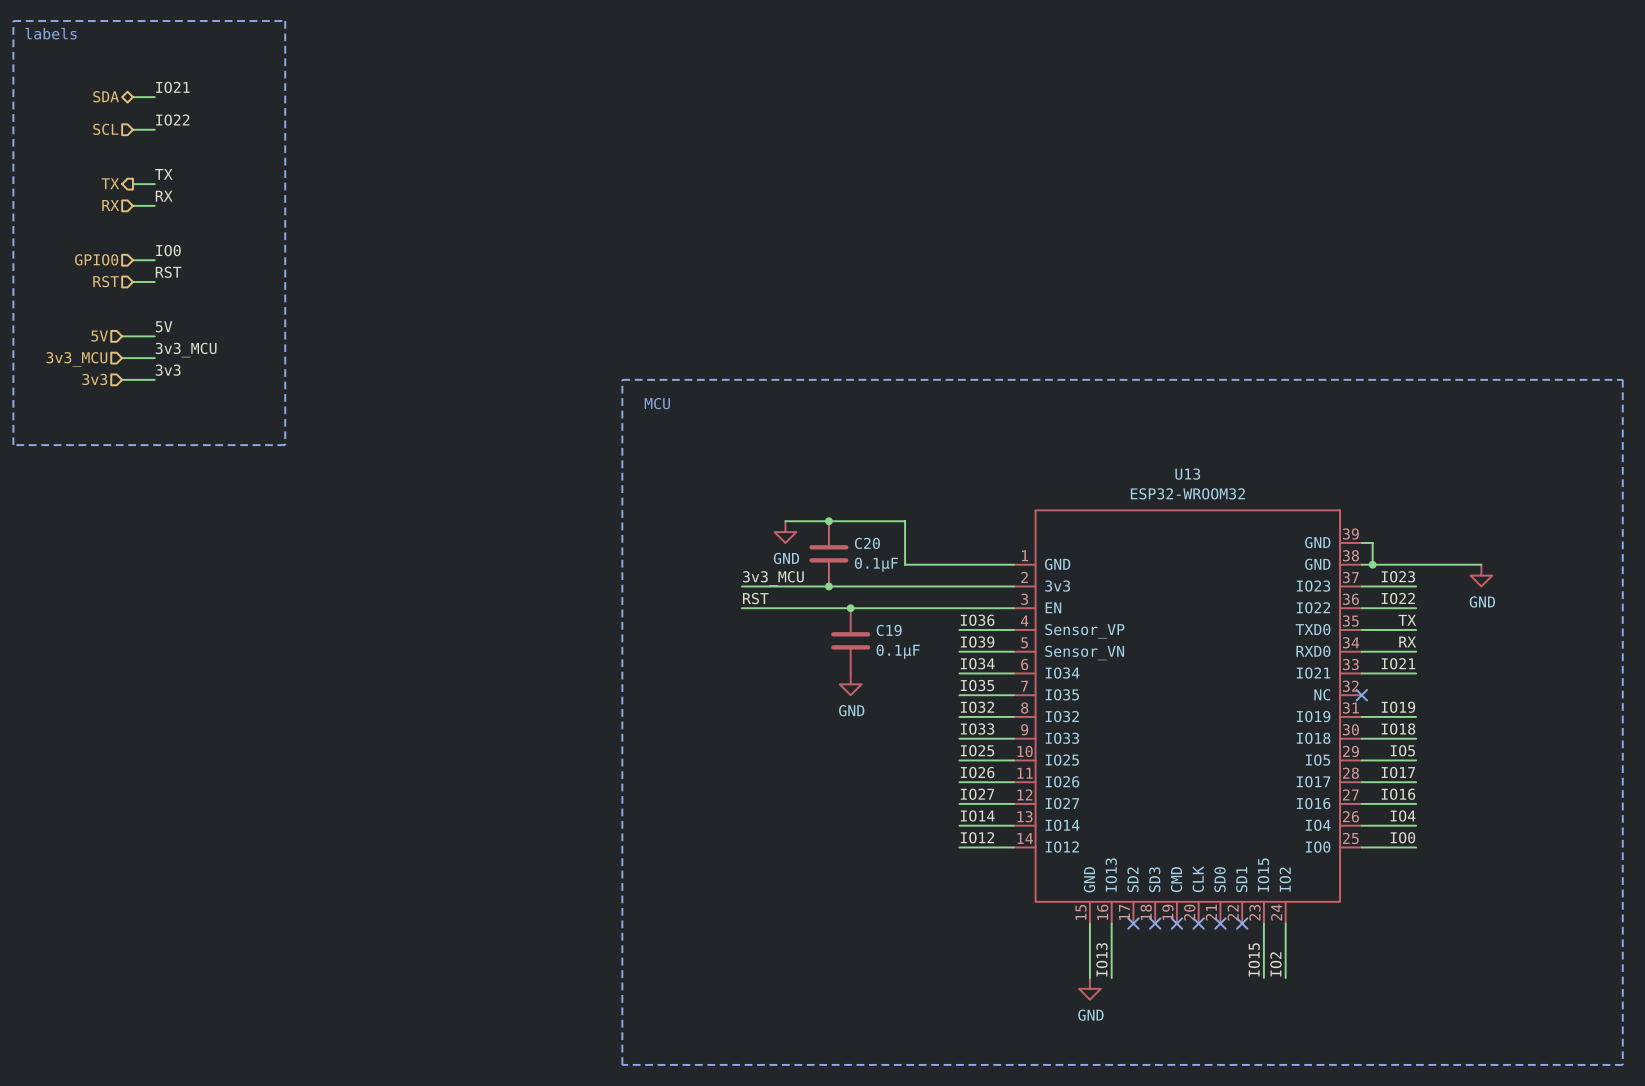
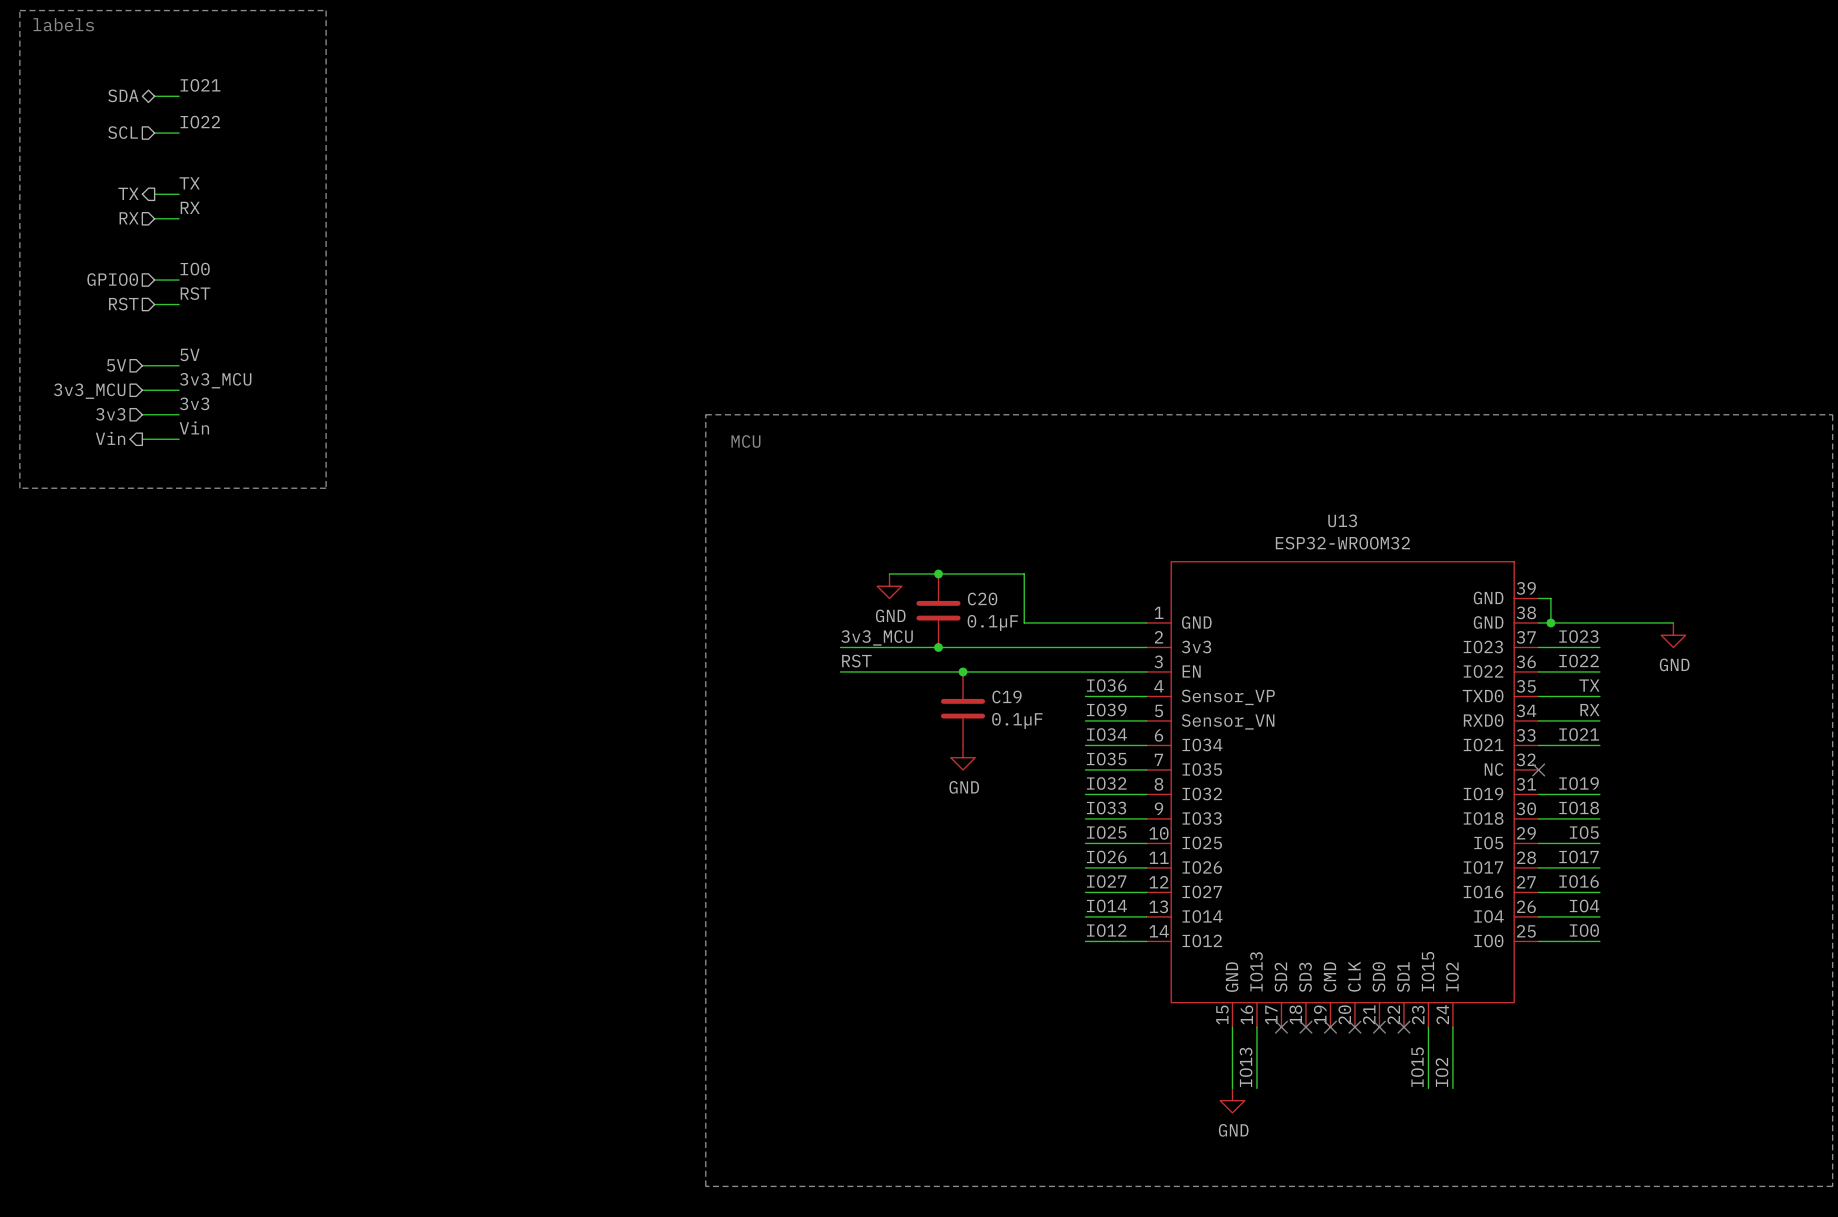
label: none -> Vin (194, 427)
hierarchical label: none -> Vin (110, 438)
wire: none -> (142, 439) (179, 439)

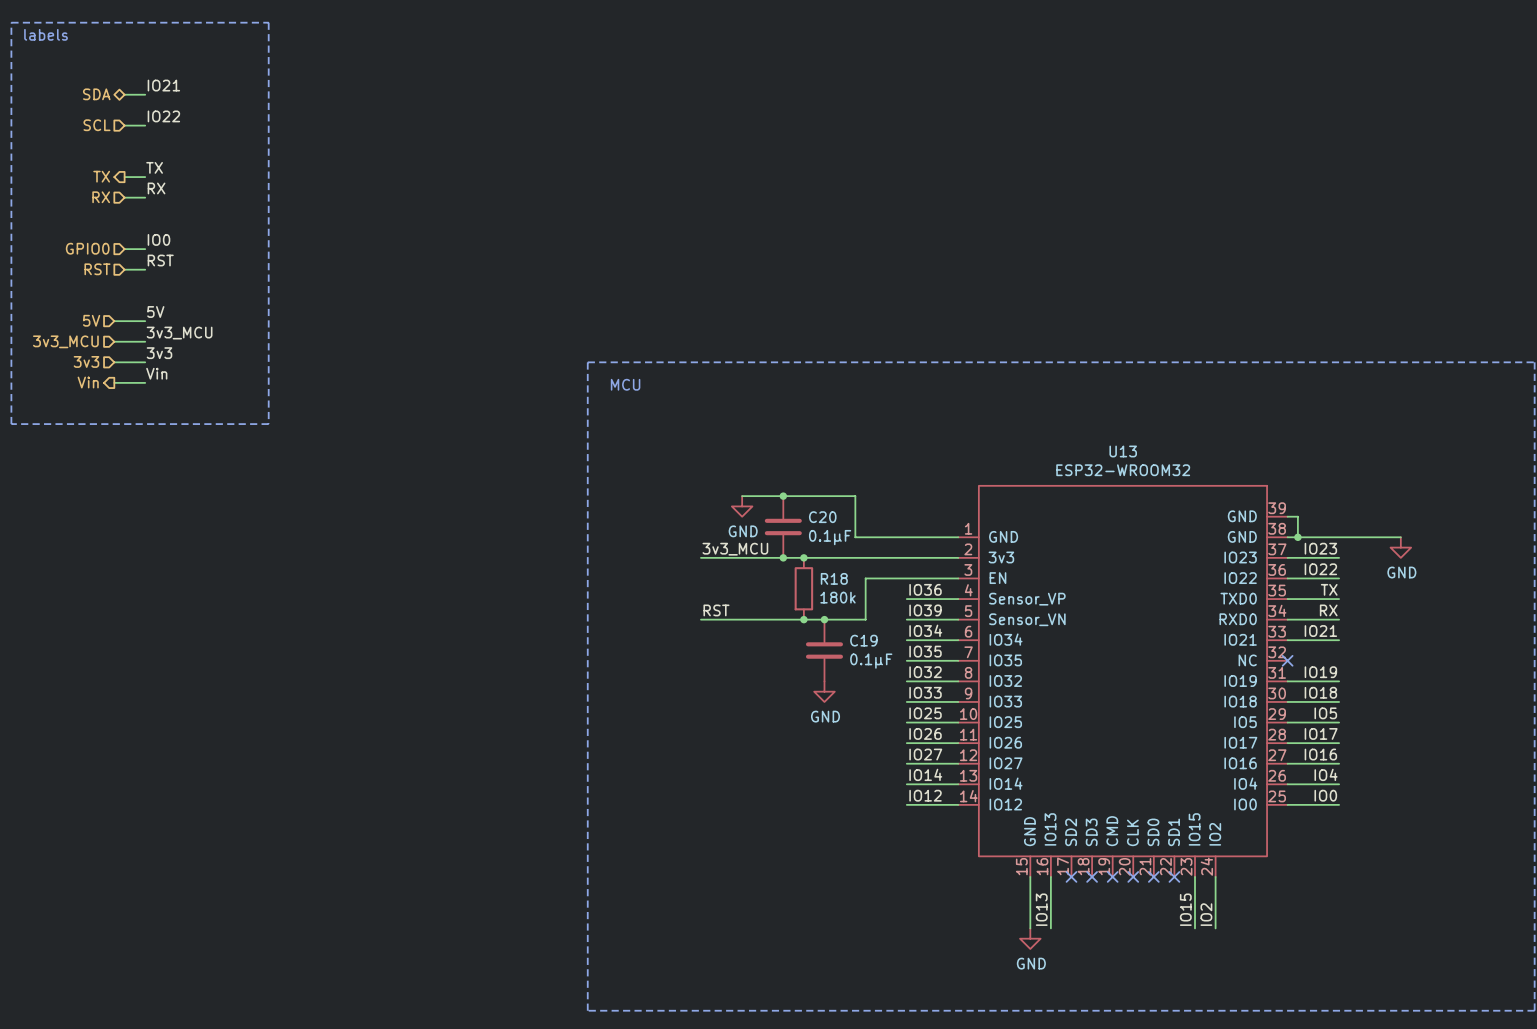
junction: none -> (803, 557)
label position: RST (856, 661) -> RST (716, 610)
wire: (840, 671) (1036, 671) -> (700, 619) (865, 619) (865, 578)
junction: (963, 671) -> none
R18: none -> 180k (803, 588)
C19 position: (963, 708) -> (824, 650)
junction: none -> (803, 619)
junction: none -> (824, 619)
power symbol position: GND (963, 757) -> GND (824, 691)

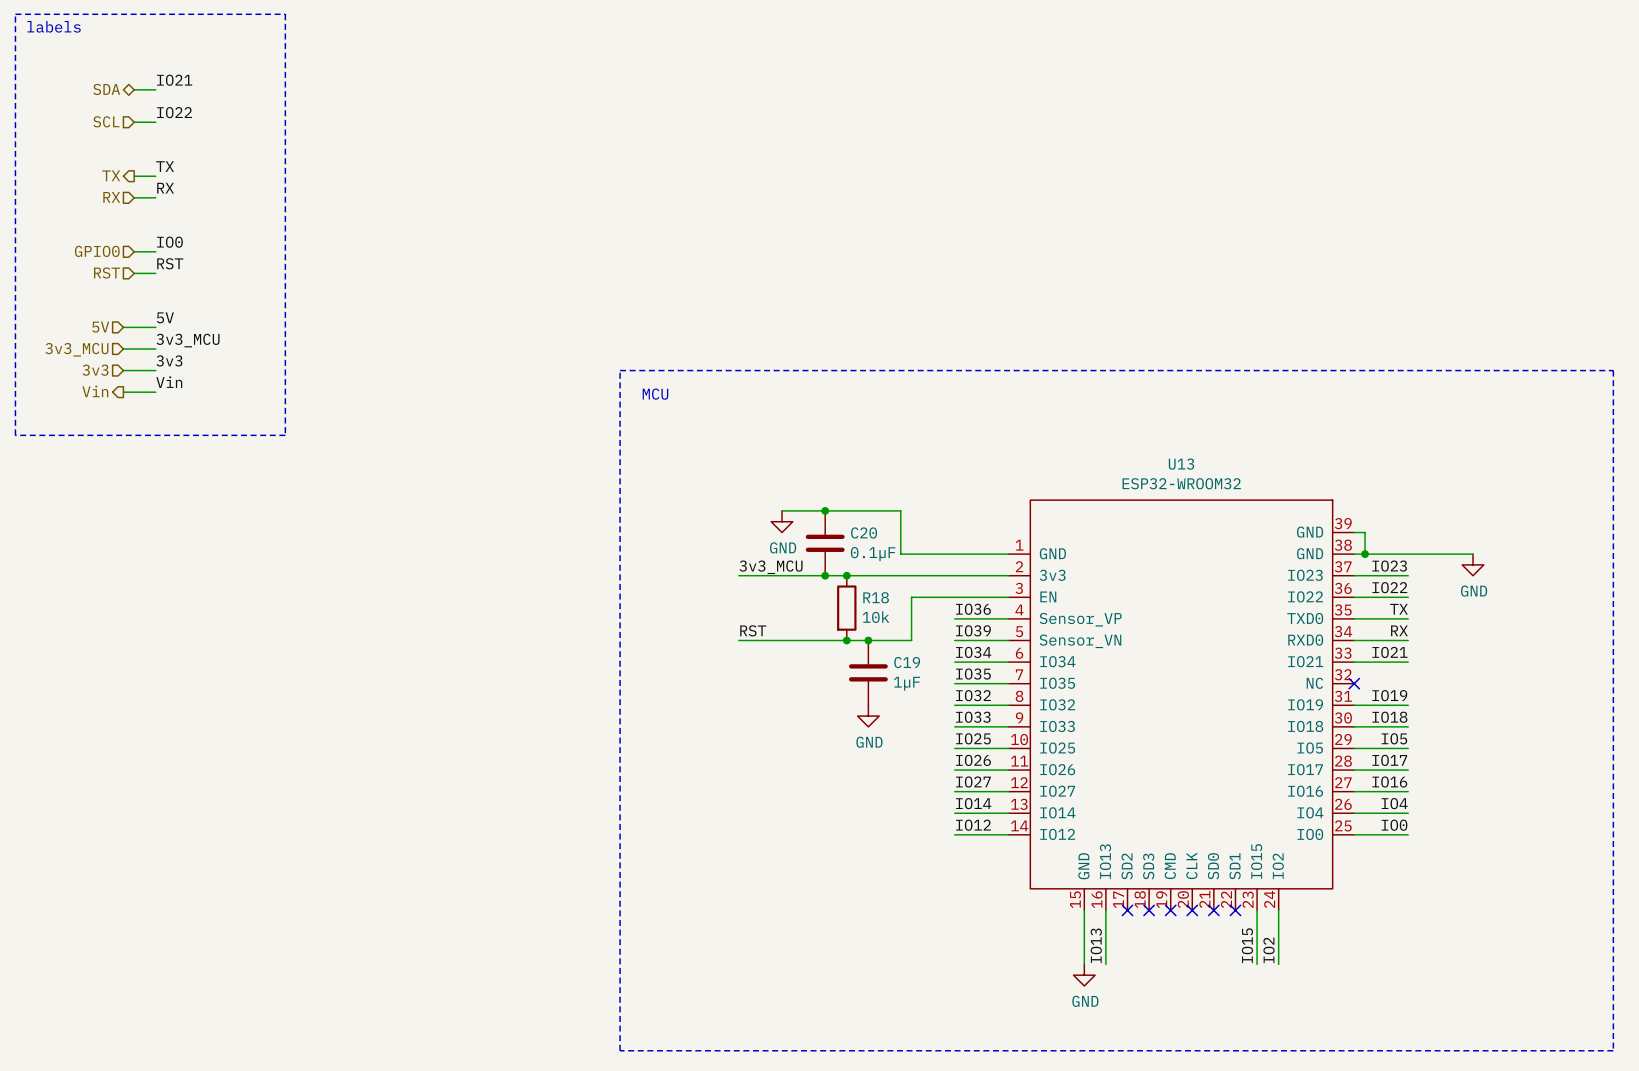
R18 value: 180k (837, 597) -> 10k (876, 617)
C19 value: 0.1µF (871, 661) -> 1µF (907, 683)

